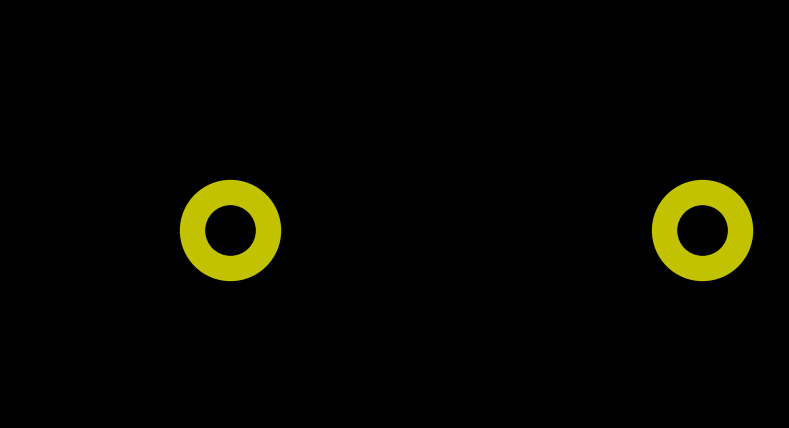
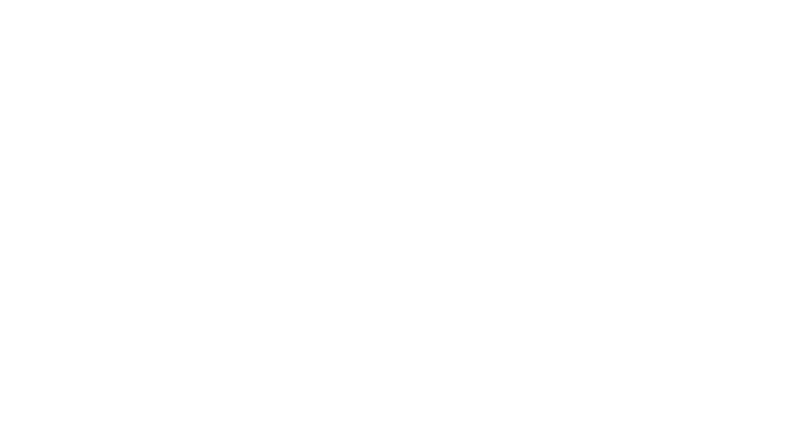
part: (230, 230) -> none
part: (702, 230) -> none

